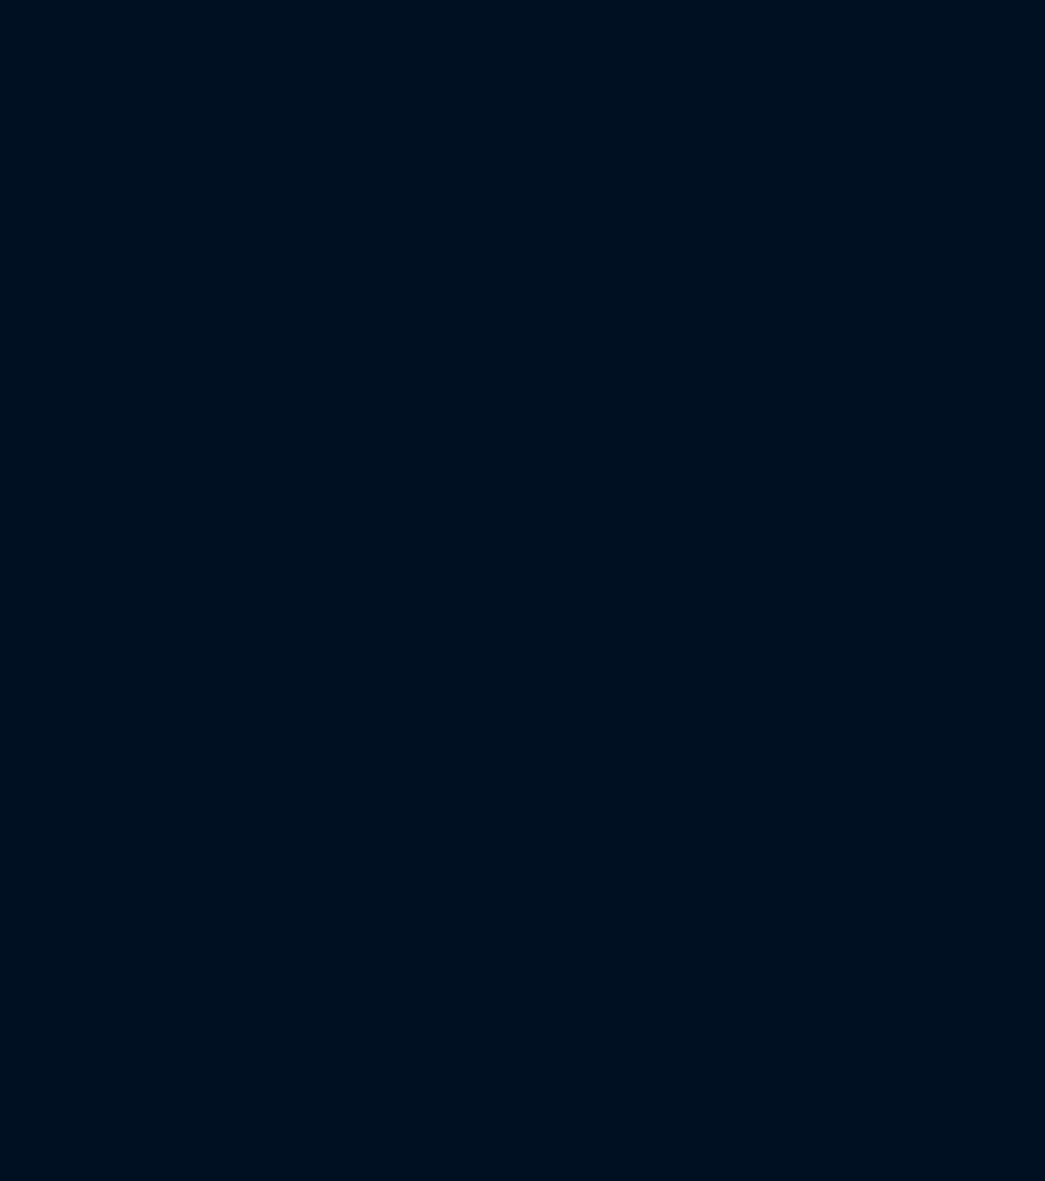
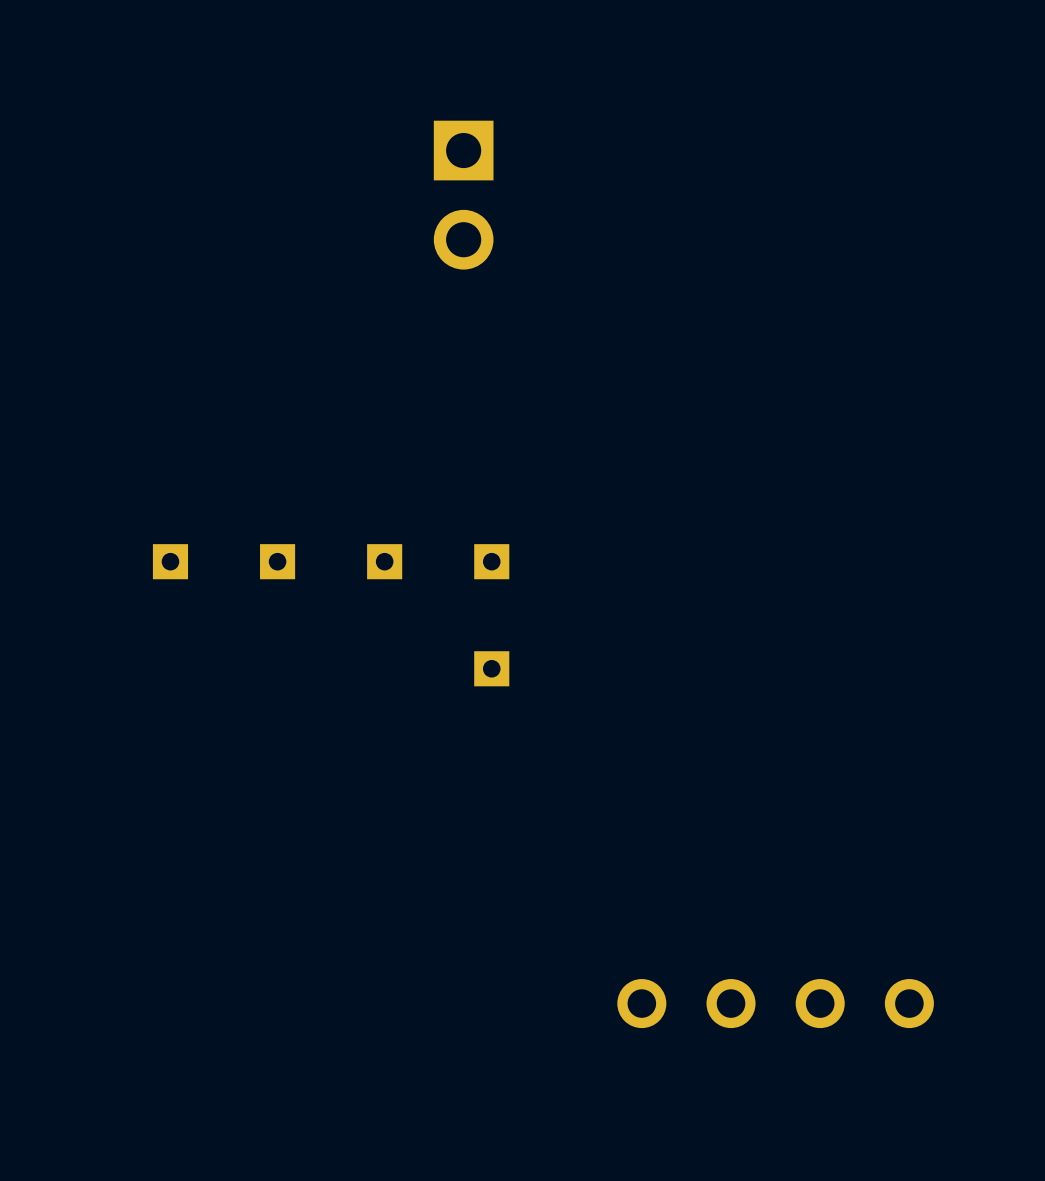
part: none -> (463, 195)
part: none -> (170, 561)
part: none -> (277, 561)
part: none -> (384, 561)
part: none -> (491, 561)
part: none -> (491, 668)
part: none -> (775, 1003)

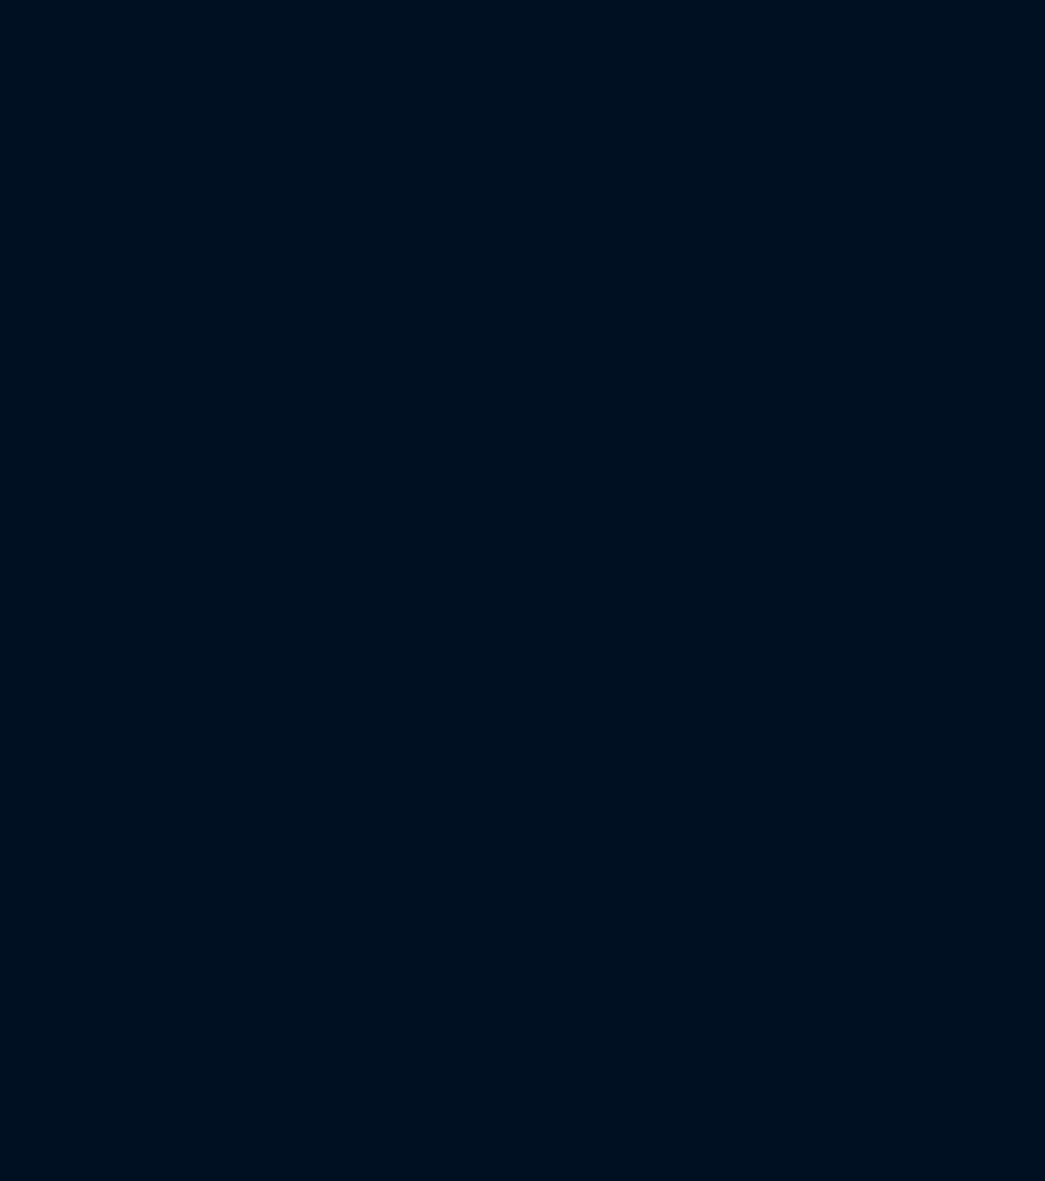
part: (463, 195) -> none
part: (170, 561) -> none
part: (277, 561) -> none
part: (384, 561) -> none
part: (491, 561) -> none
part: (491, 668) -> none
part: (775, 1003) -> none

